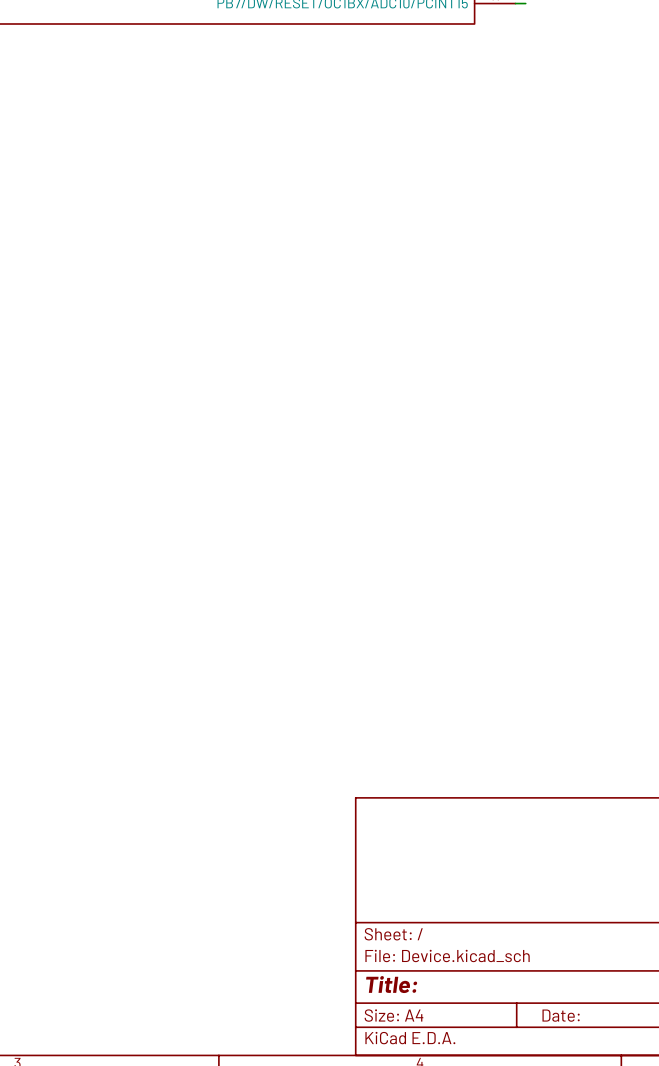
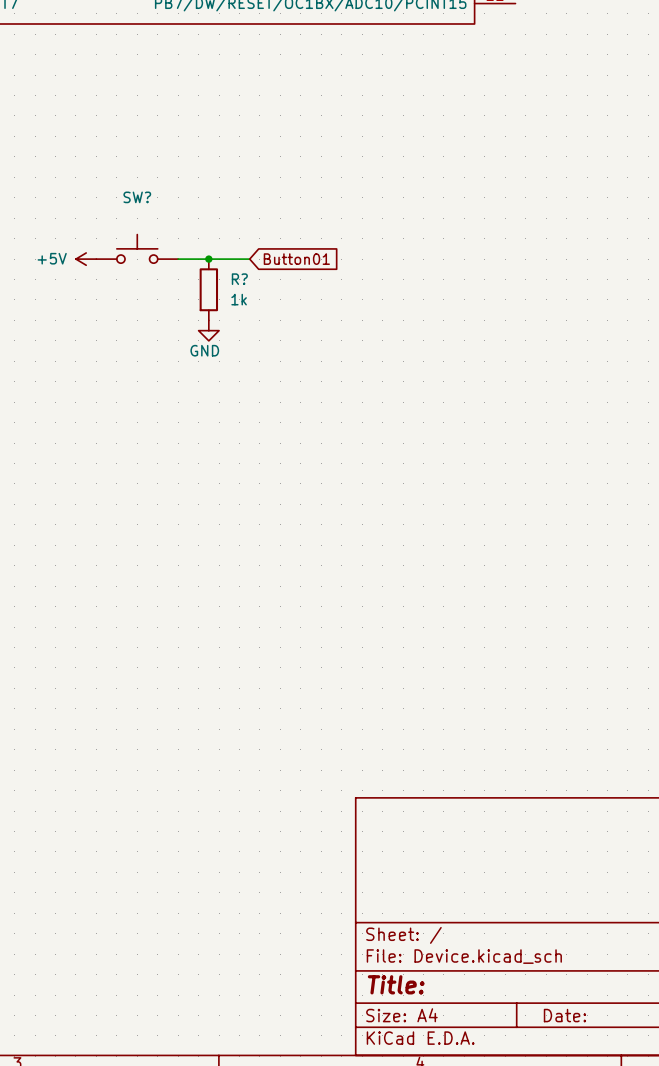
wire: (515, 3) (525, 3) -> none
SW?: none -> (137, 248)
power symbol: none -> +5V (86, 259)
wire: none -> (178, 259) (249, 259)
junction: none -> (208, 259)
global label: none -> Button01 (296, 259)
R?: none -> 1k (208, 289)
power symbol: none -> GND (208, 330)

